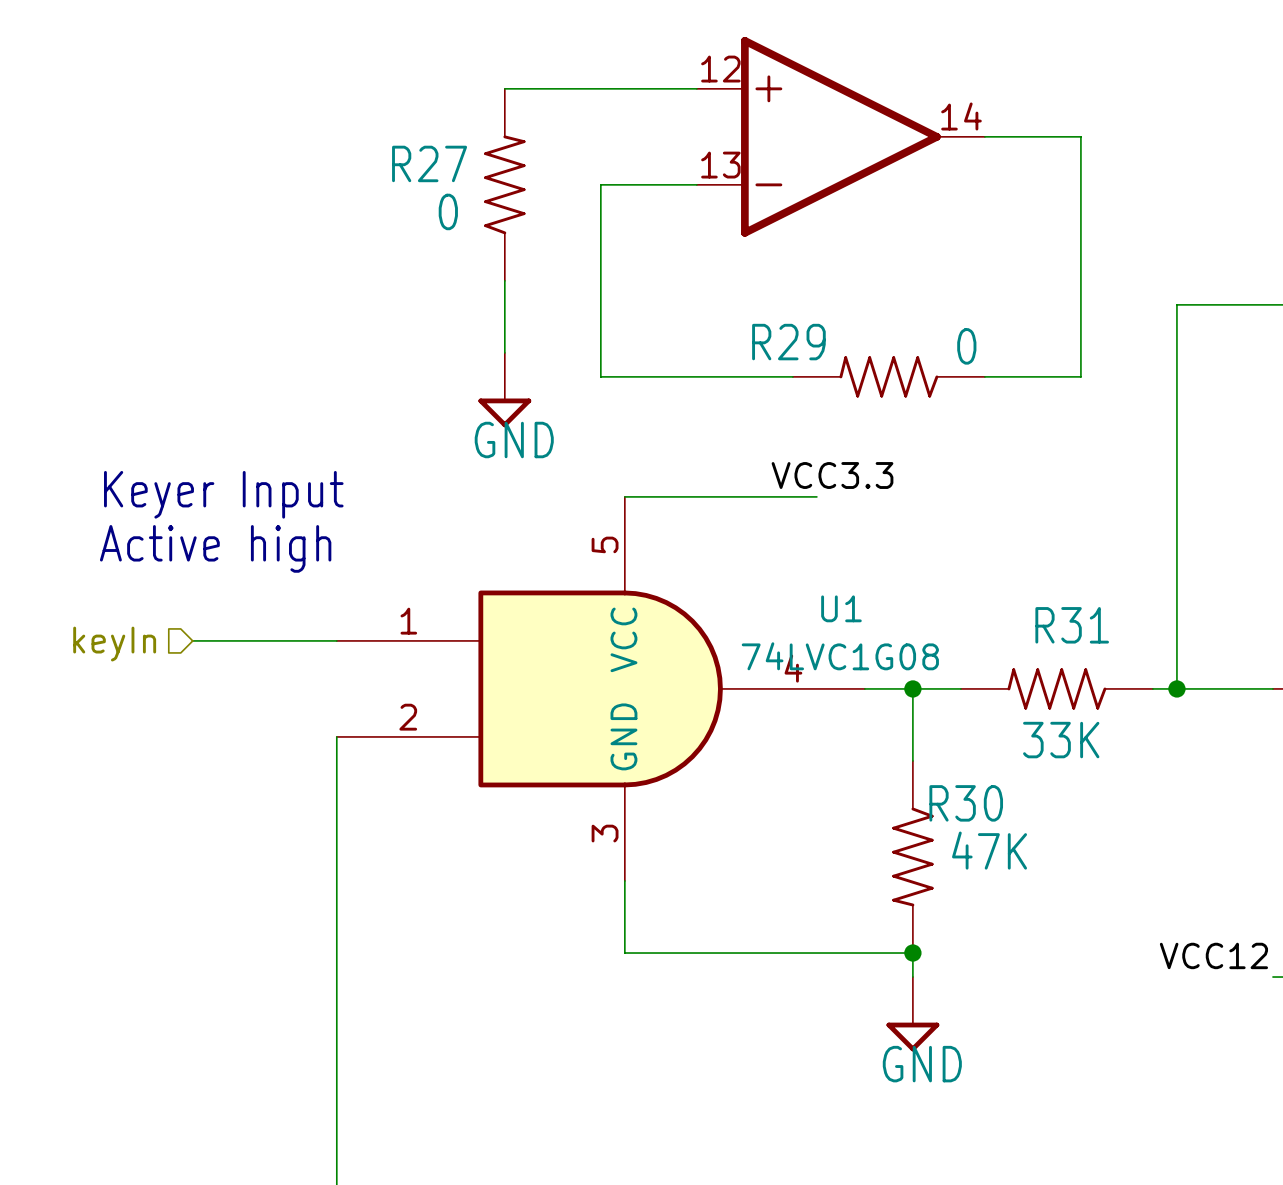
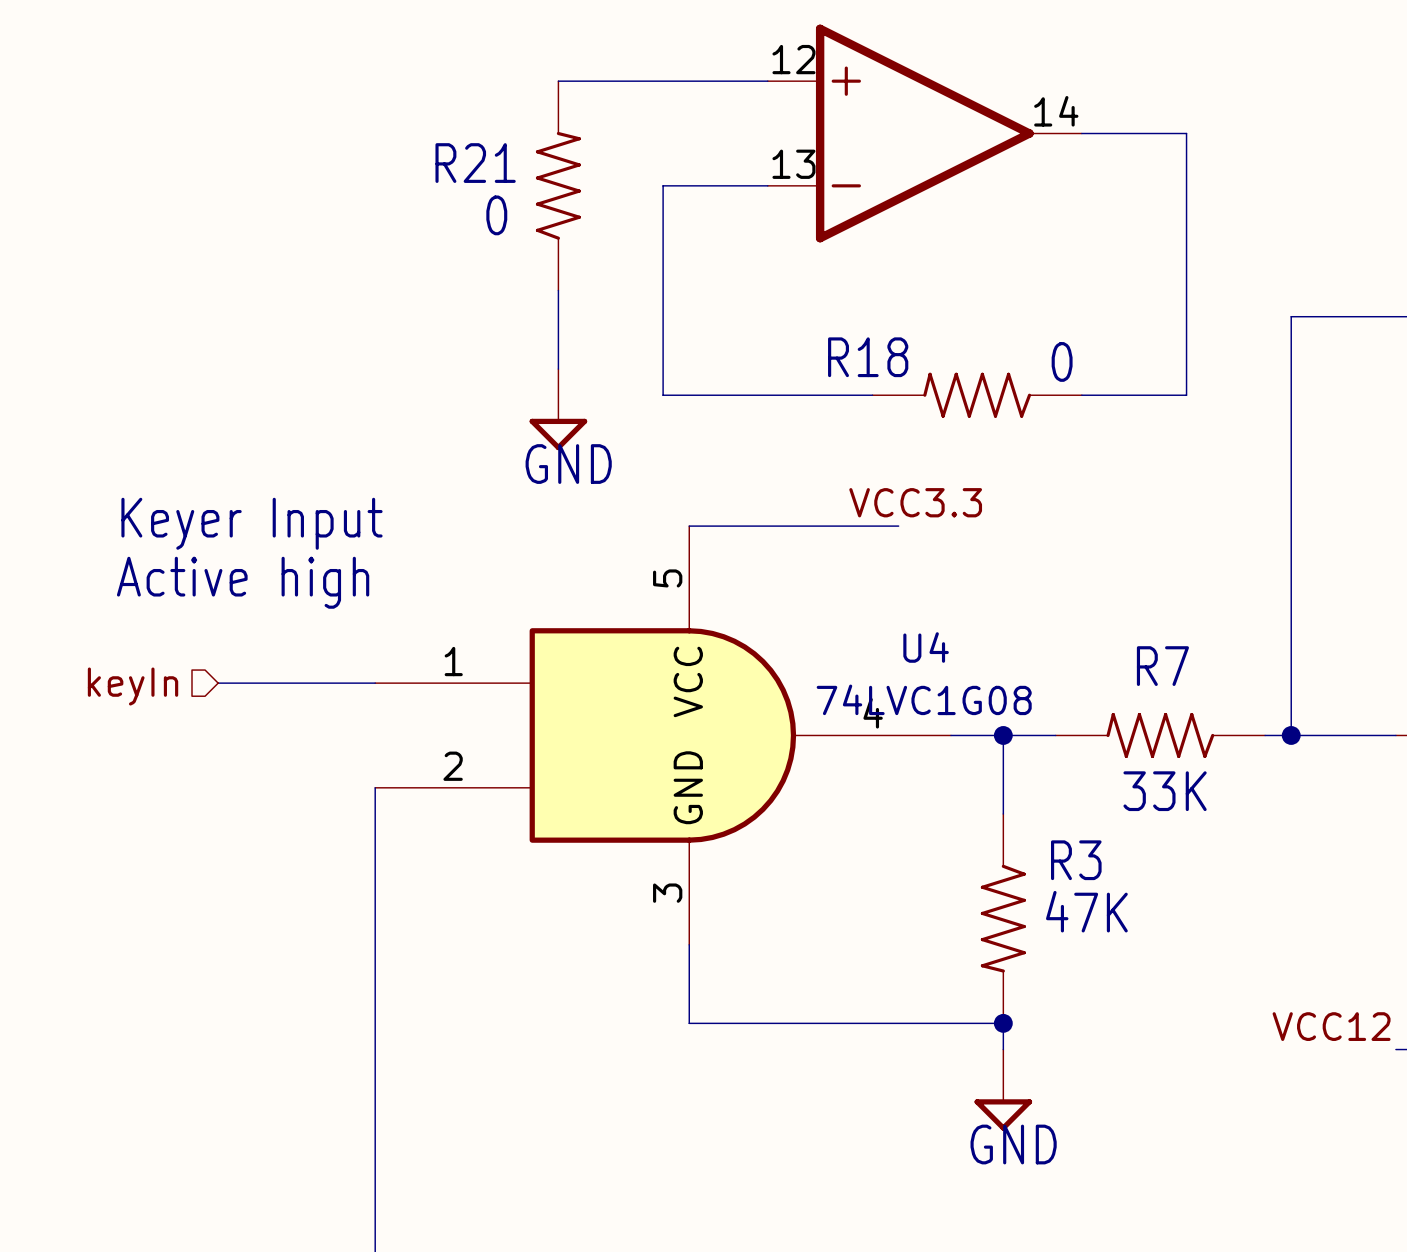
R27 name: R27 (429, 163) -> R21 (475, 163)
R29 name: R29 (788, 342) -> R18 (868, 357)
U1 name: U1 (841, 608) -> U4 (926, 647)
R31 name: R31 (1072, 625) -> R7 (1162, 666)
R30 name: R30 (966, 803) -> R3 (1076, 860)

